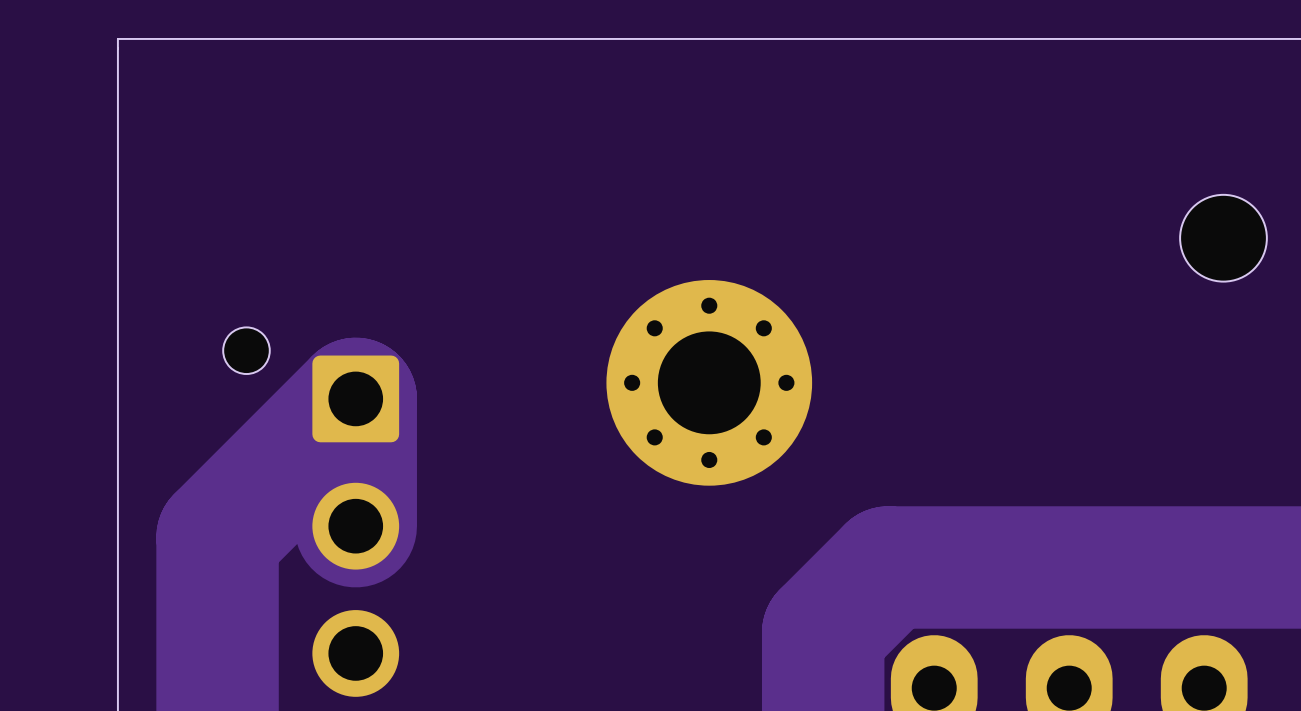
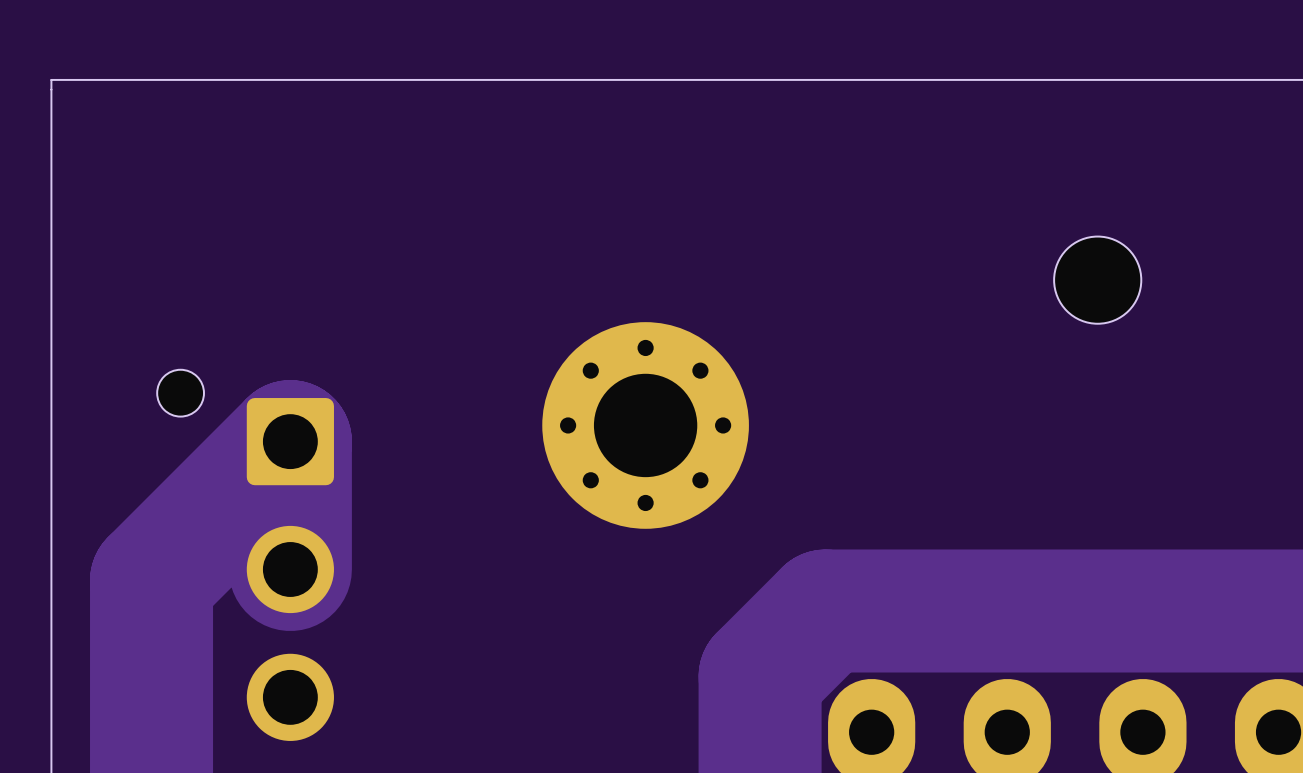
part position: (1223, 238) -> (1097, 280)

